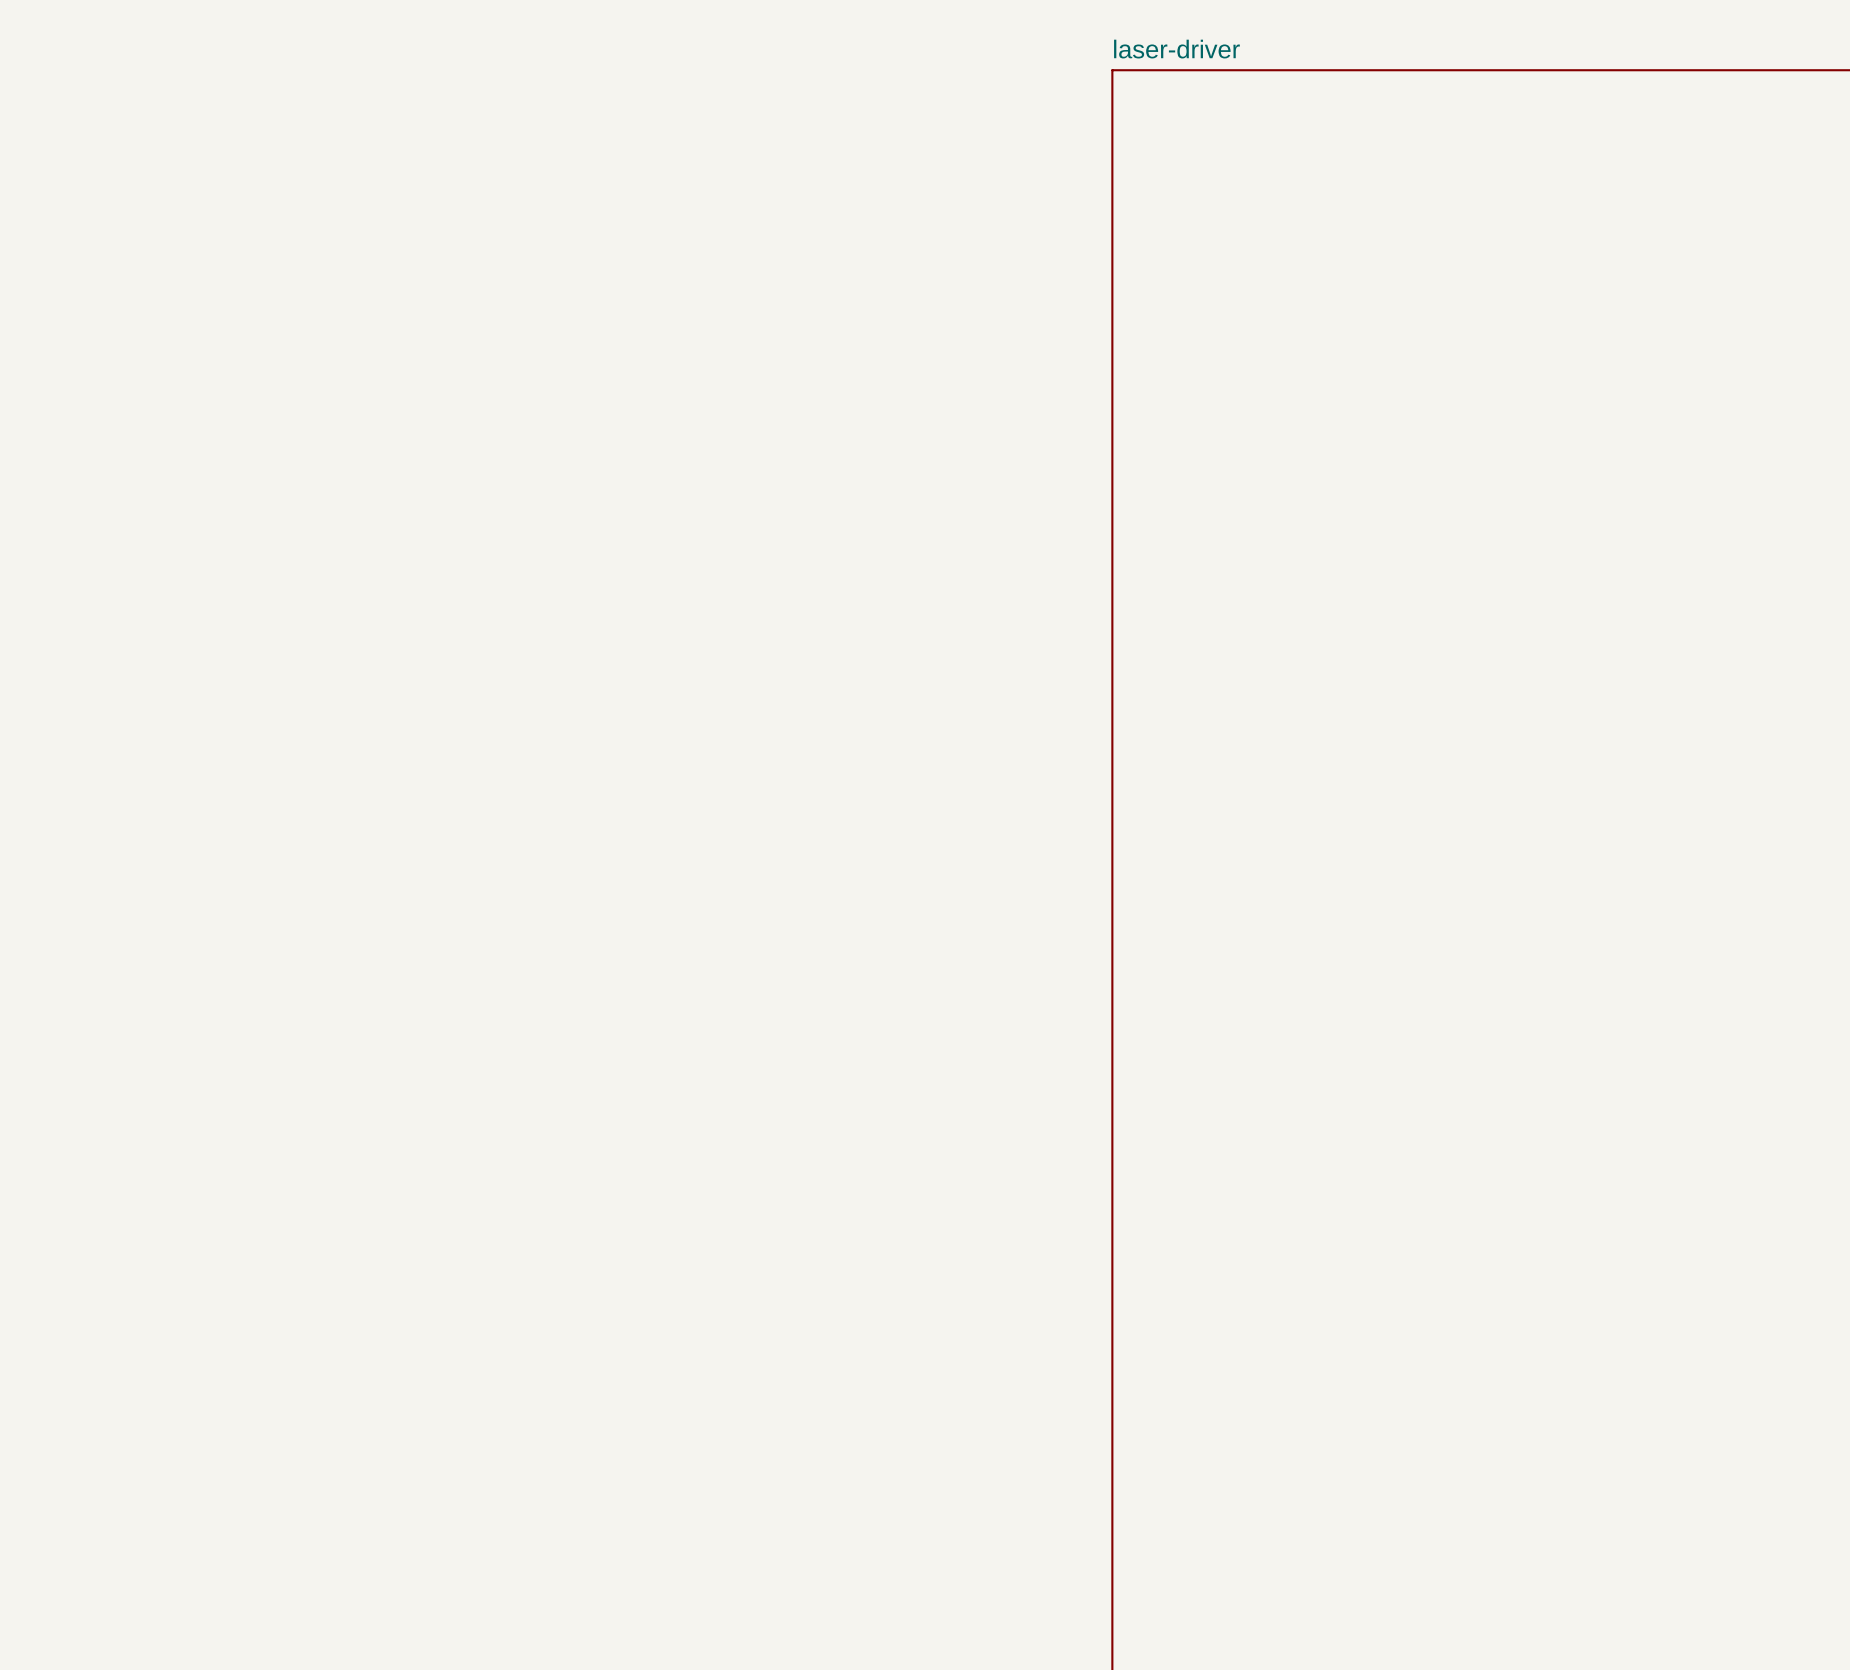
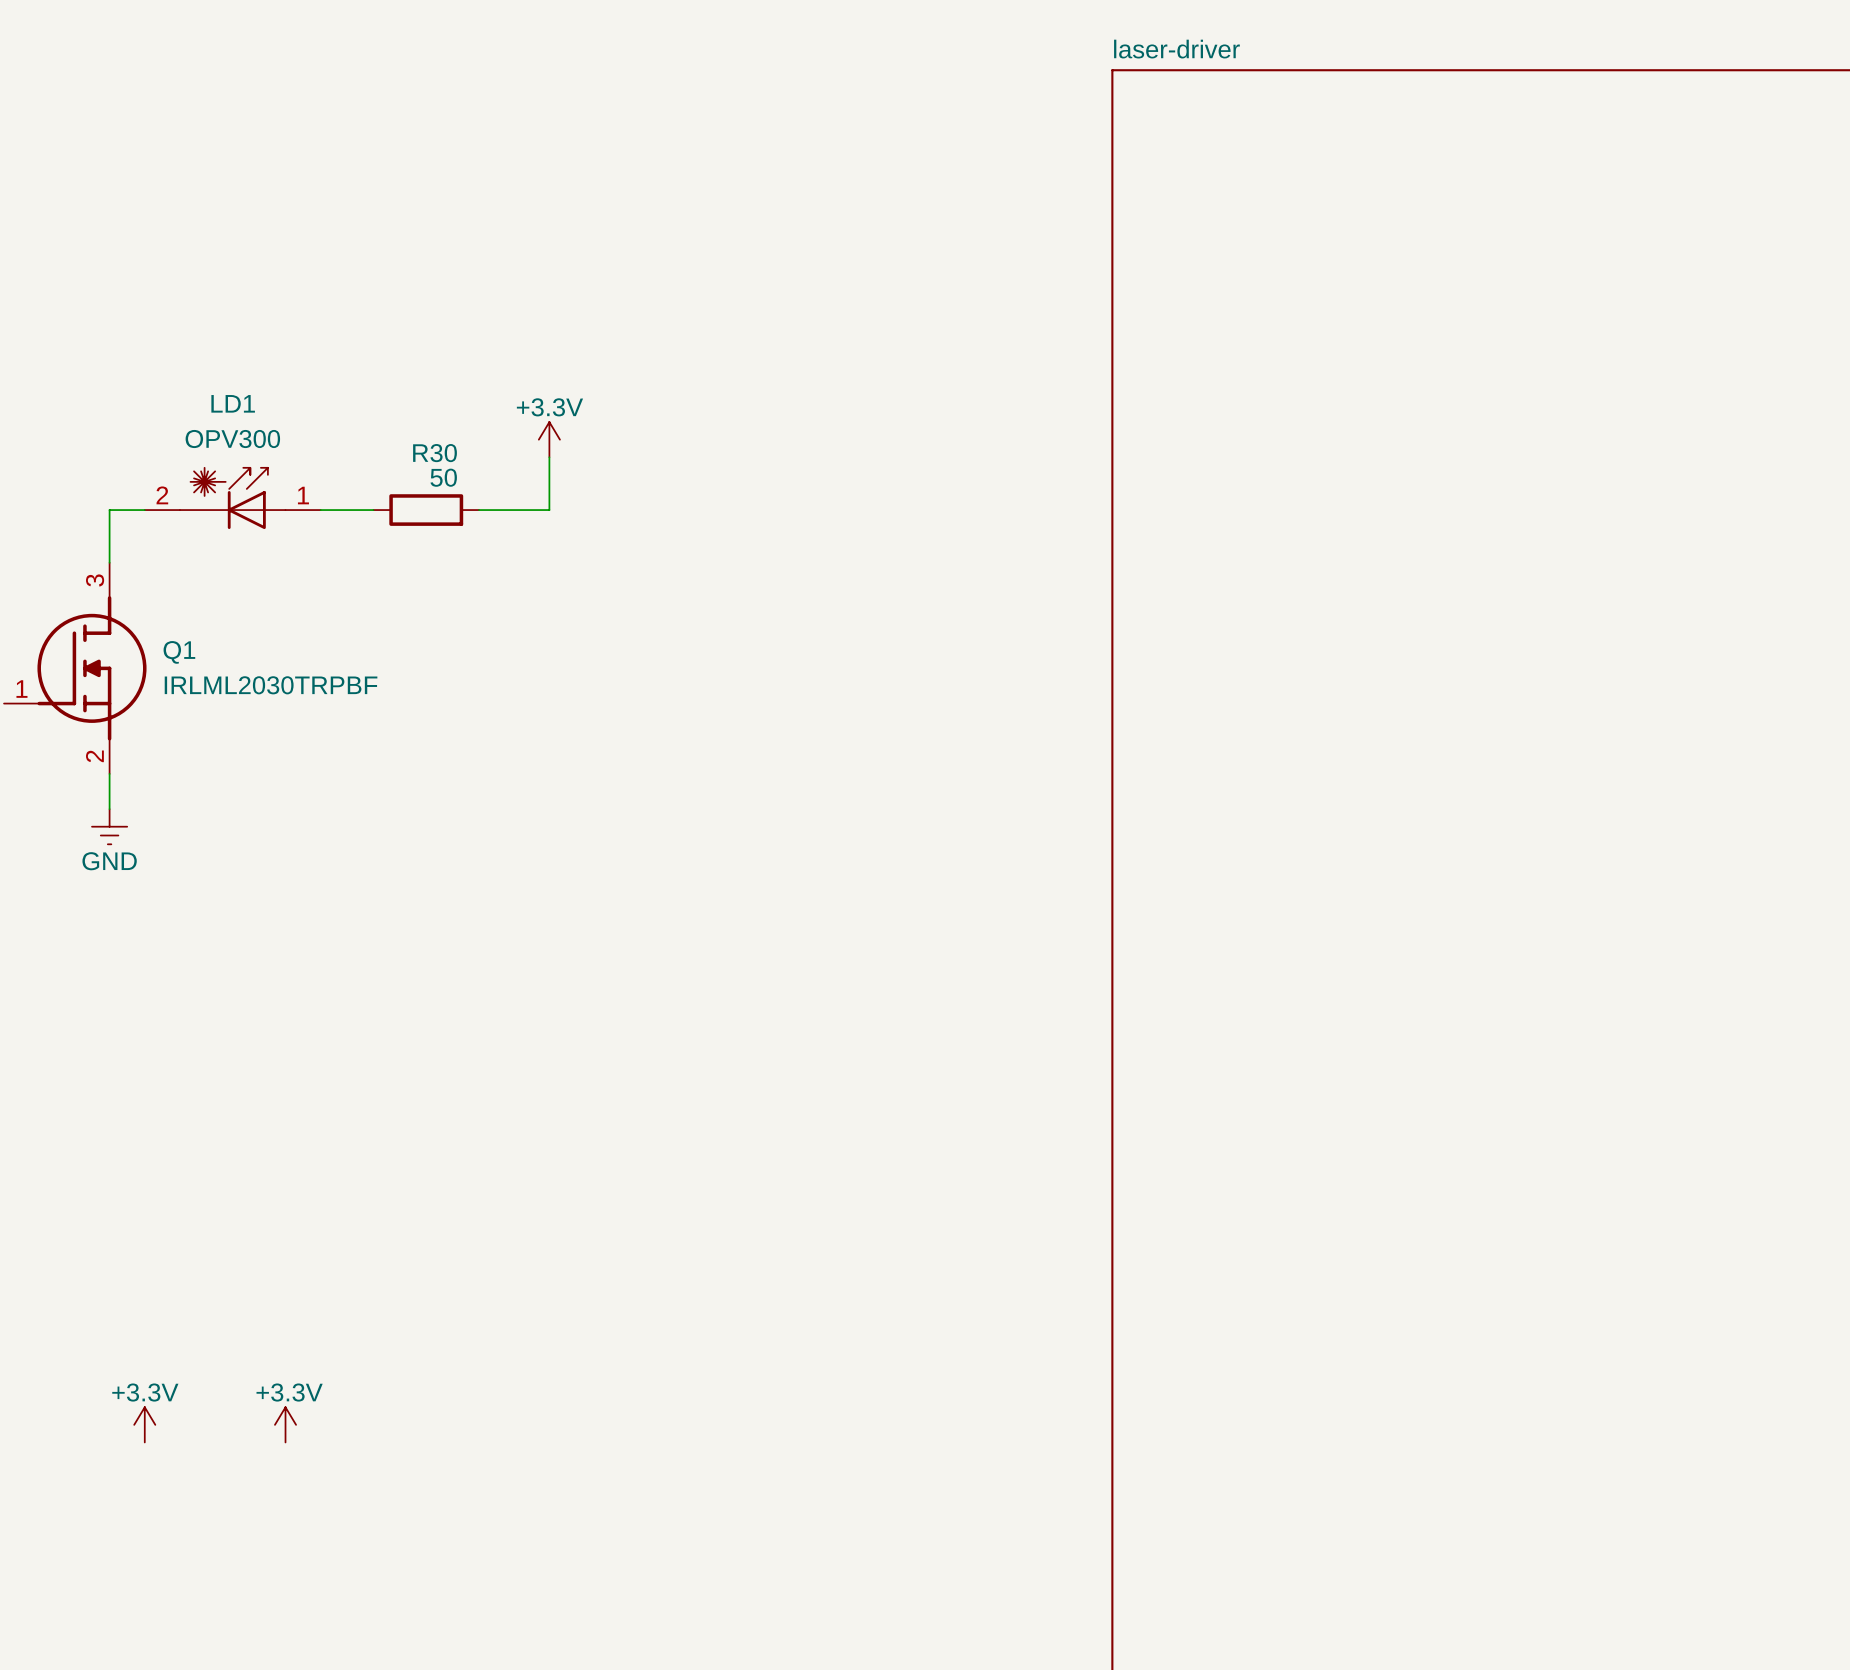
power symbol: none -> +3.3V (549, 439)
wire: none -> (549, 457) (549, 510) (479, 510)
LD1: none -> OPV300 (232, 498)
wire: none -> (144, 510) (109, 510) (109, 562)
wire: none -> (320, 510) (373, 510)
R30: none -> 50 (426, 510)
Q1: none -> IRLML2030TRPBF (75, 668)
wire: none -> (109, 773) (109, 809)
power symbol: none -> GND (109, 826)
power symbol: none -> +3.3V (144, 1424)
power symbol: none -> +3.3V (285, 1424)

